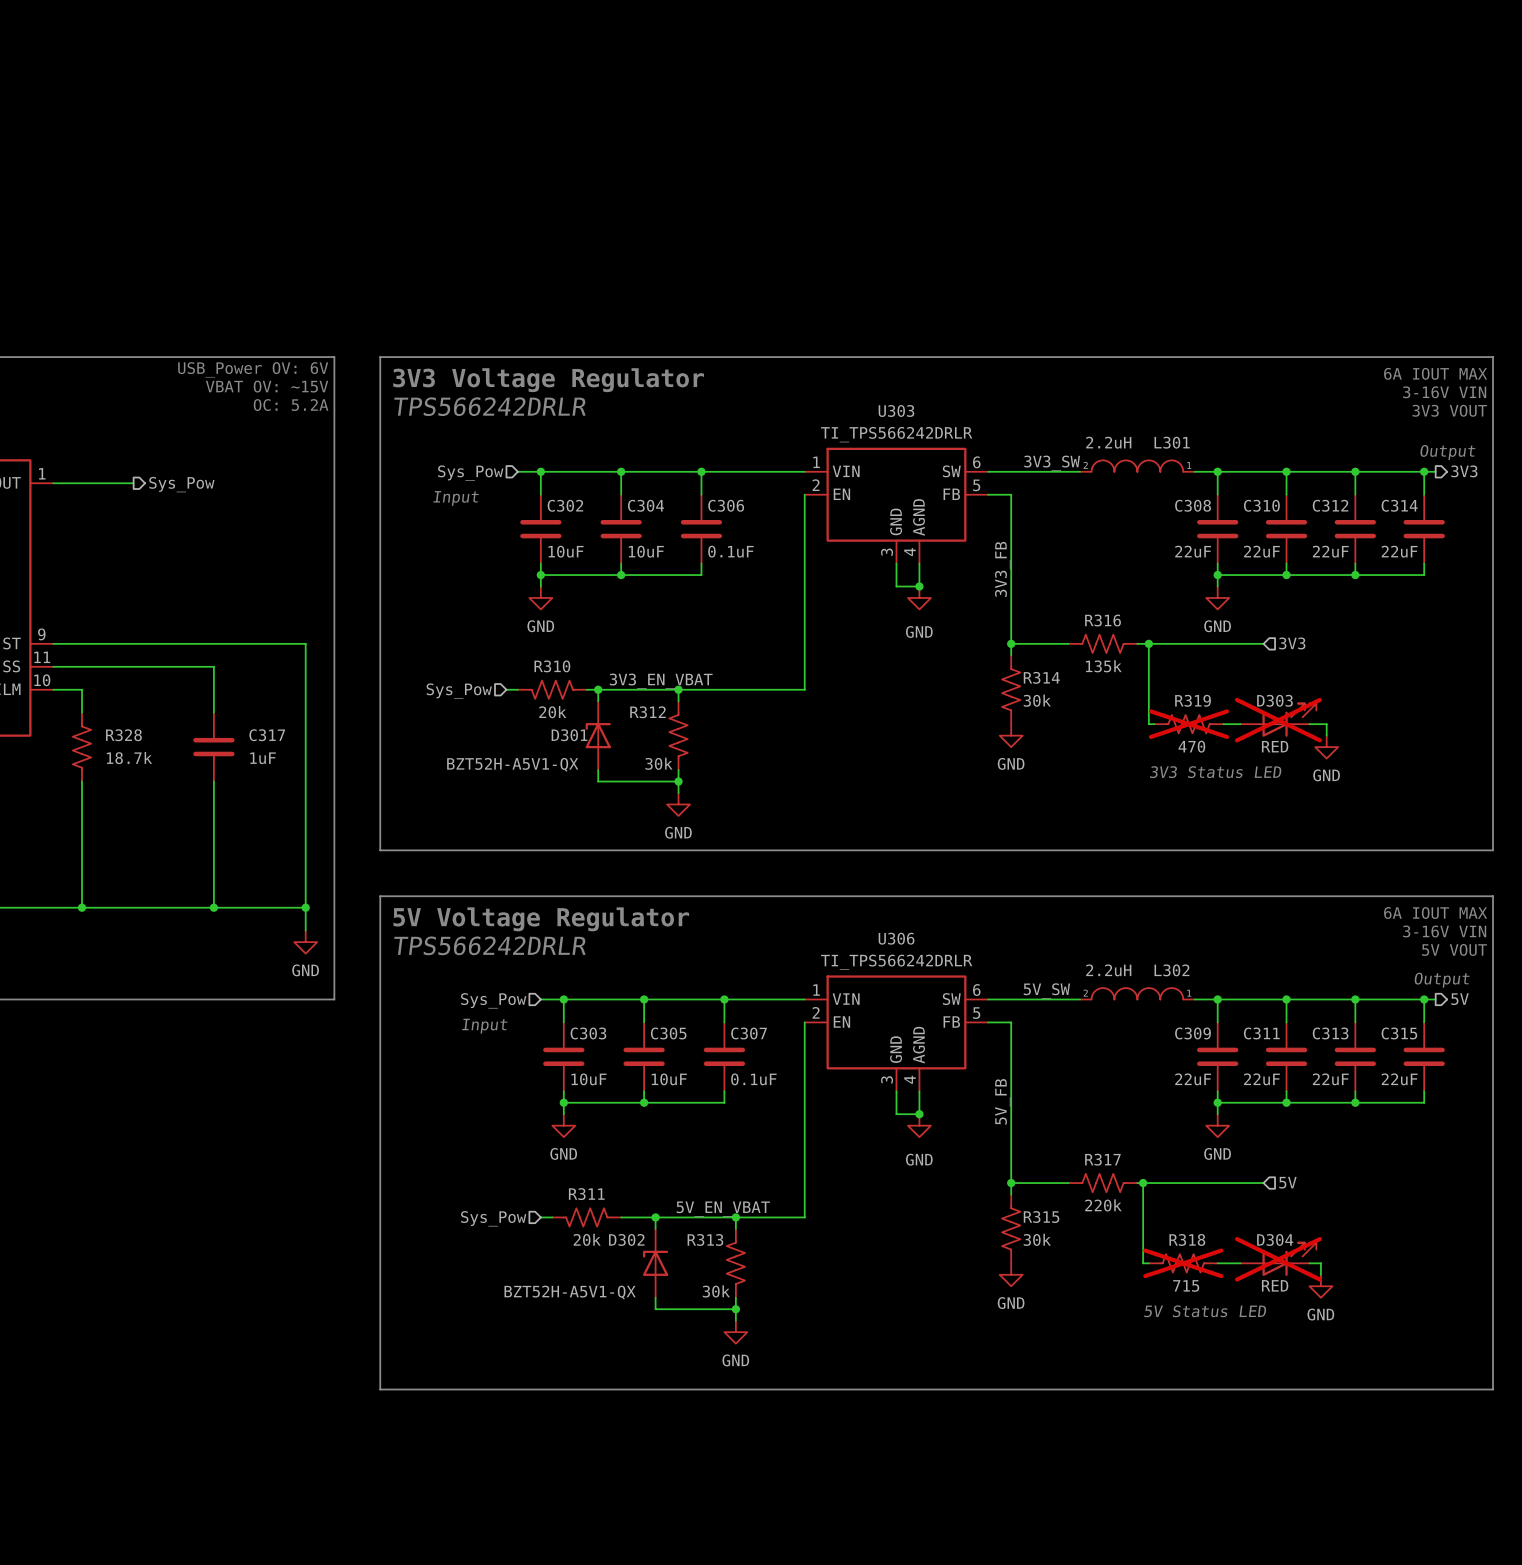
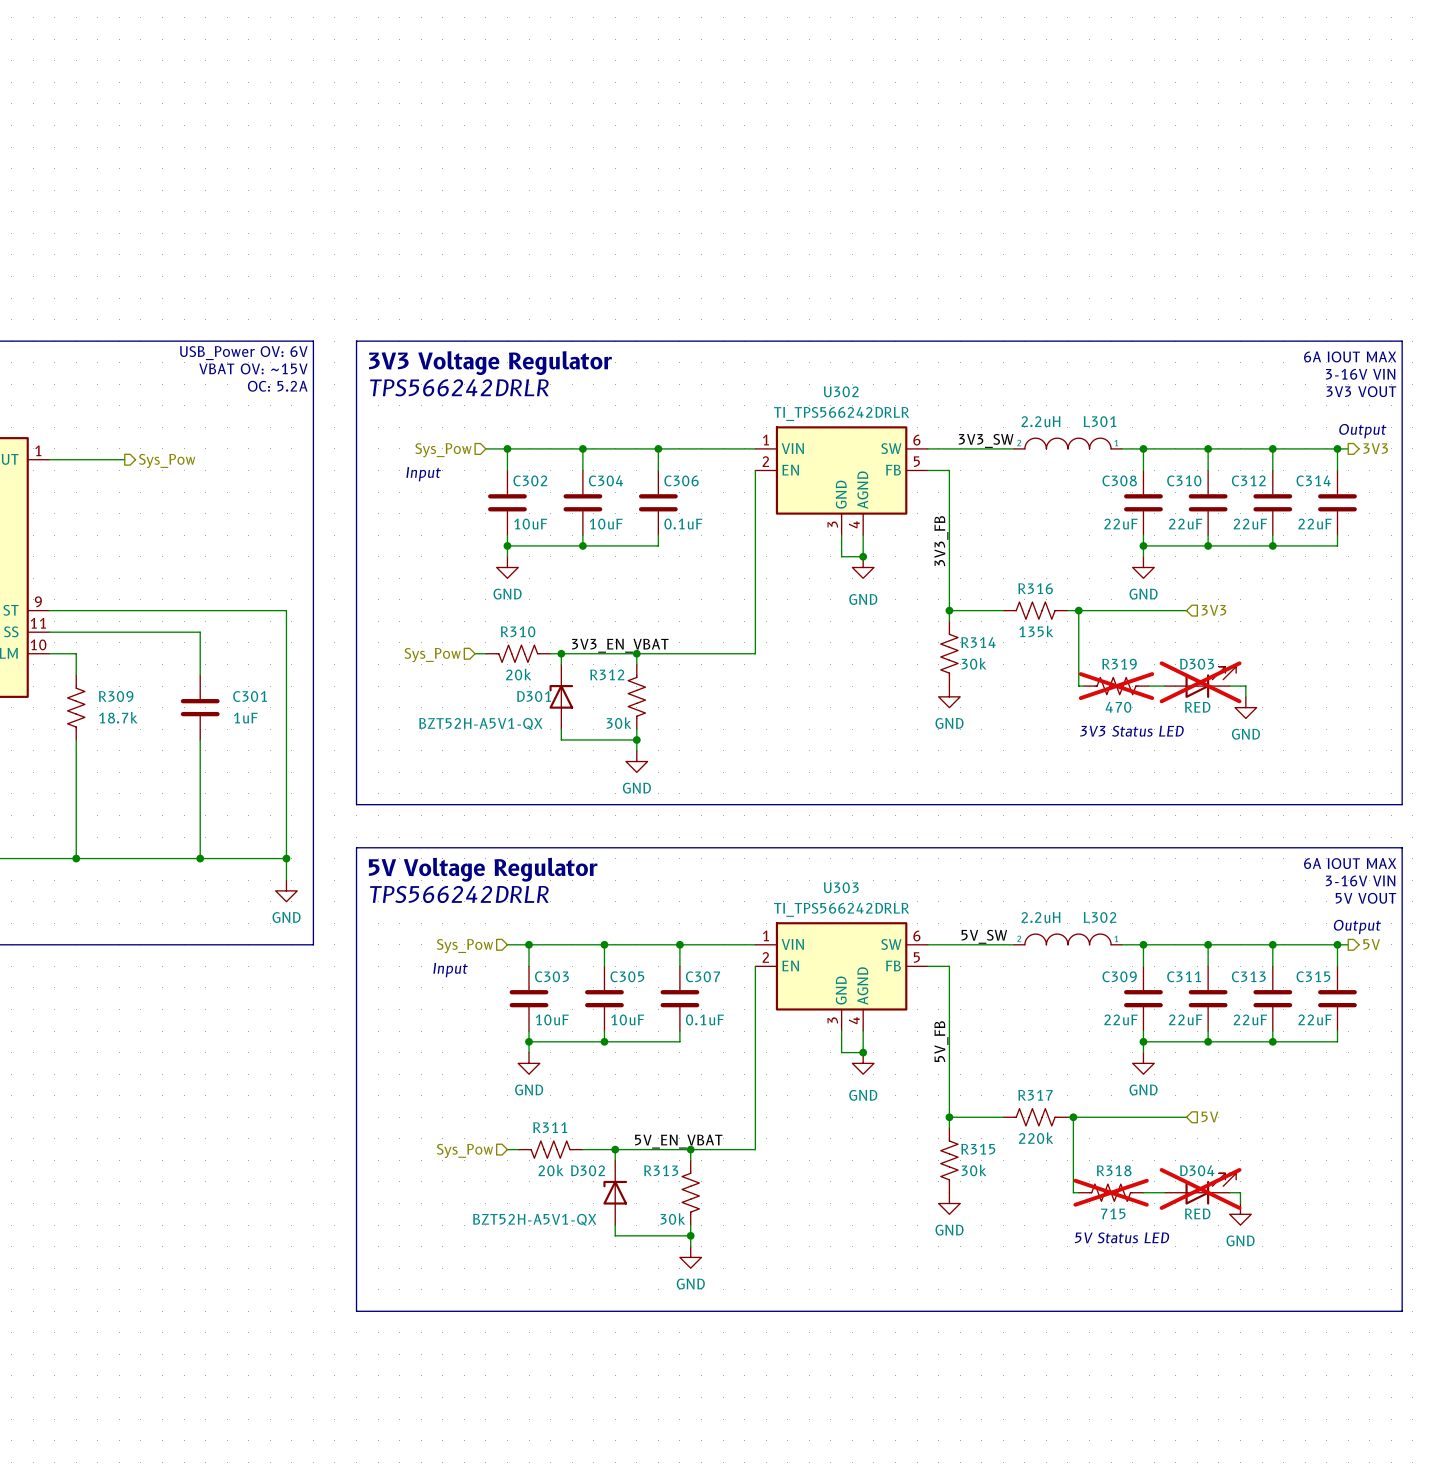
U303 name: U303 (896, 410) -> U302 (841, 391)
R328 name: R328 (123, 735) -> R309 (116, 696)
C317 name: C317 (267, 735) -> C301 (250, 696)
U306 name: U306 (896, 938) -> U303 (841, 887)

